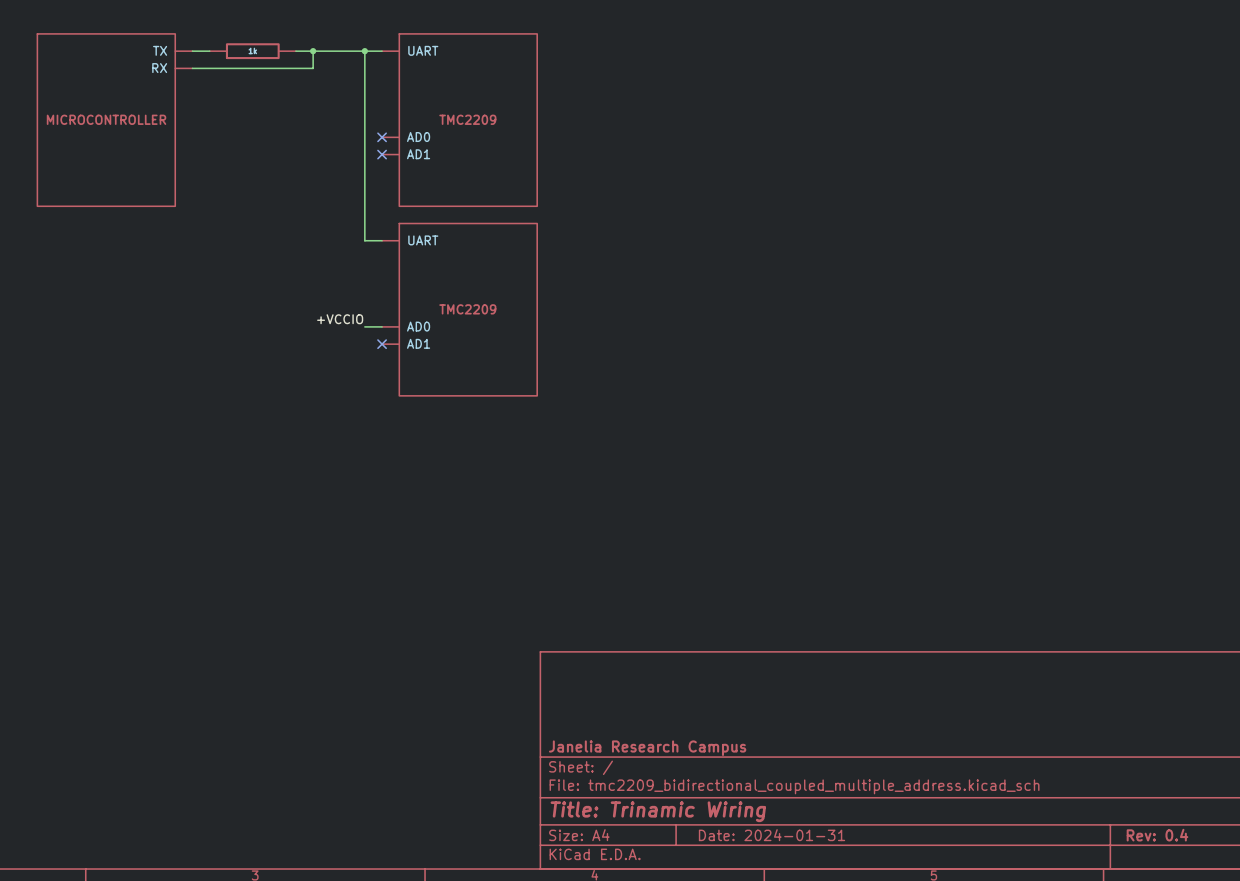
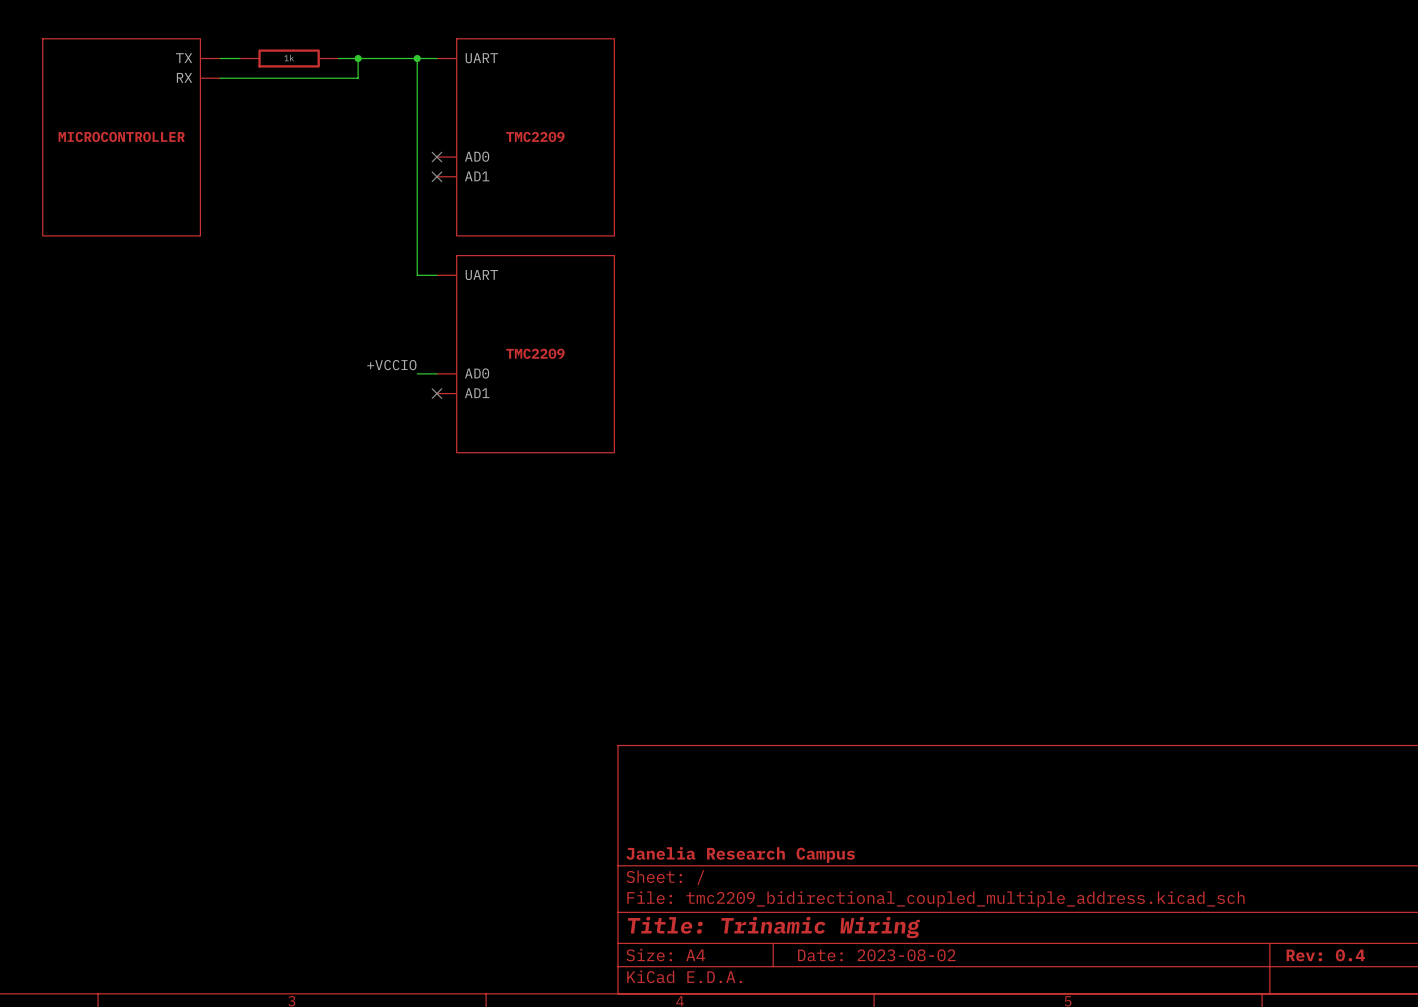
title block: Date: 2024-01-31 (772, 835) -> Date: 2023-08-02 (876, 955)

